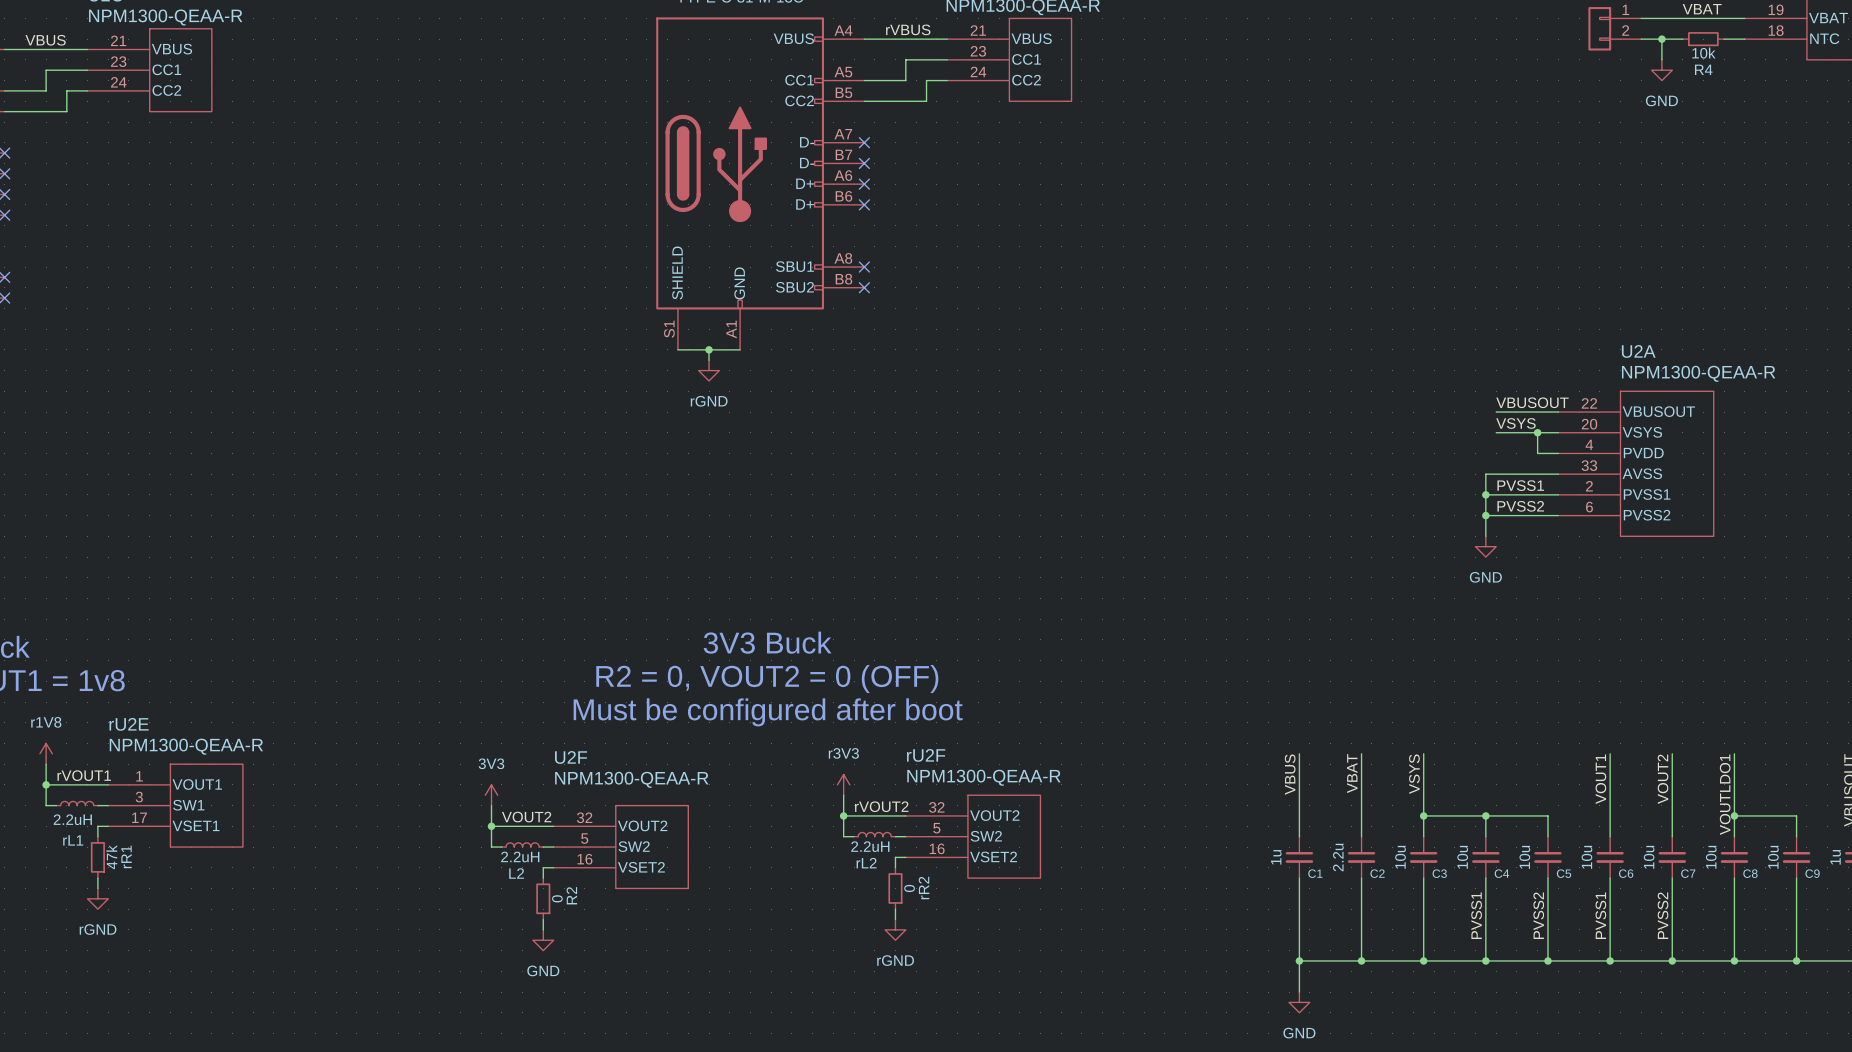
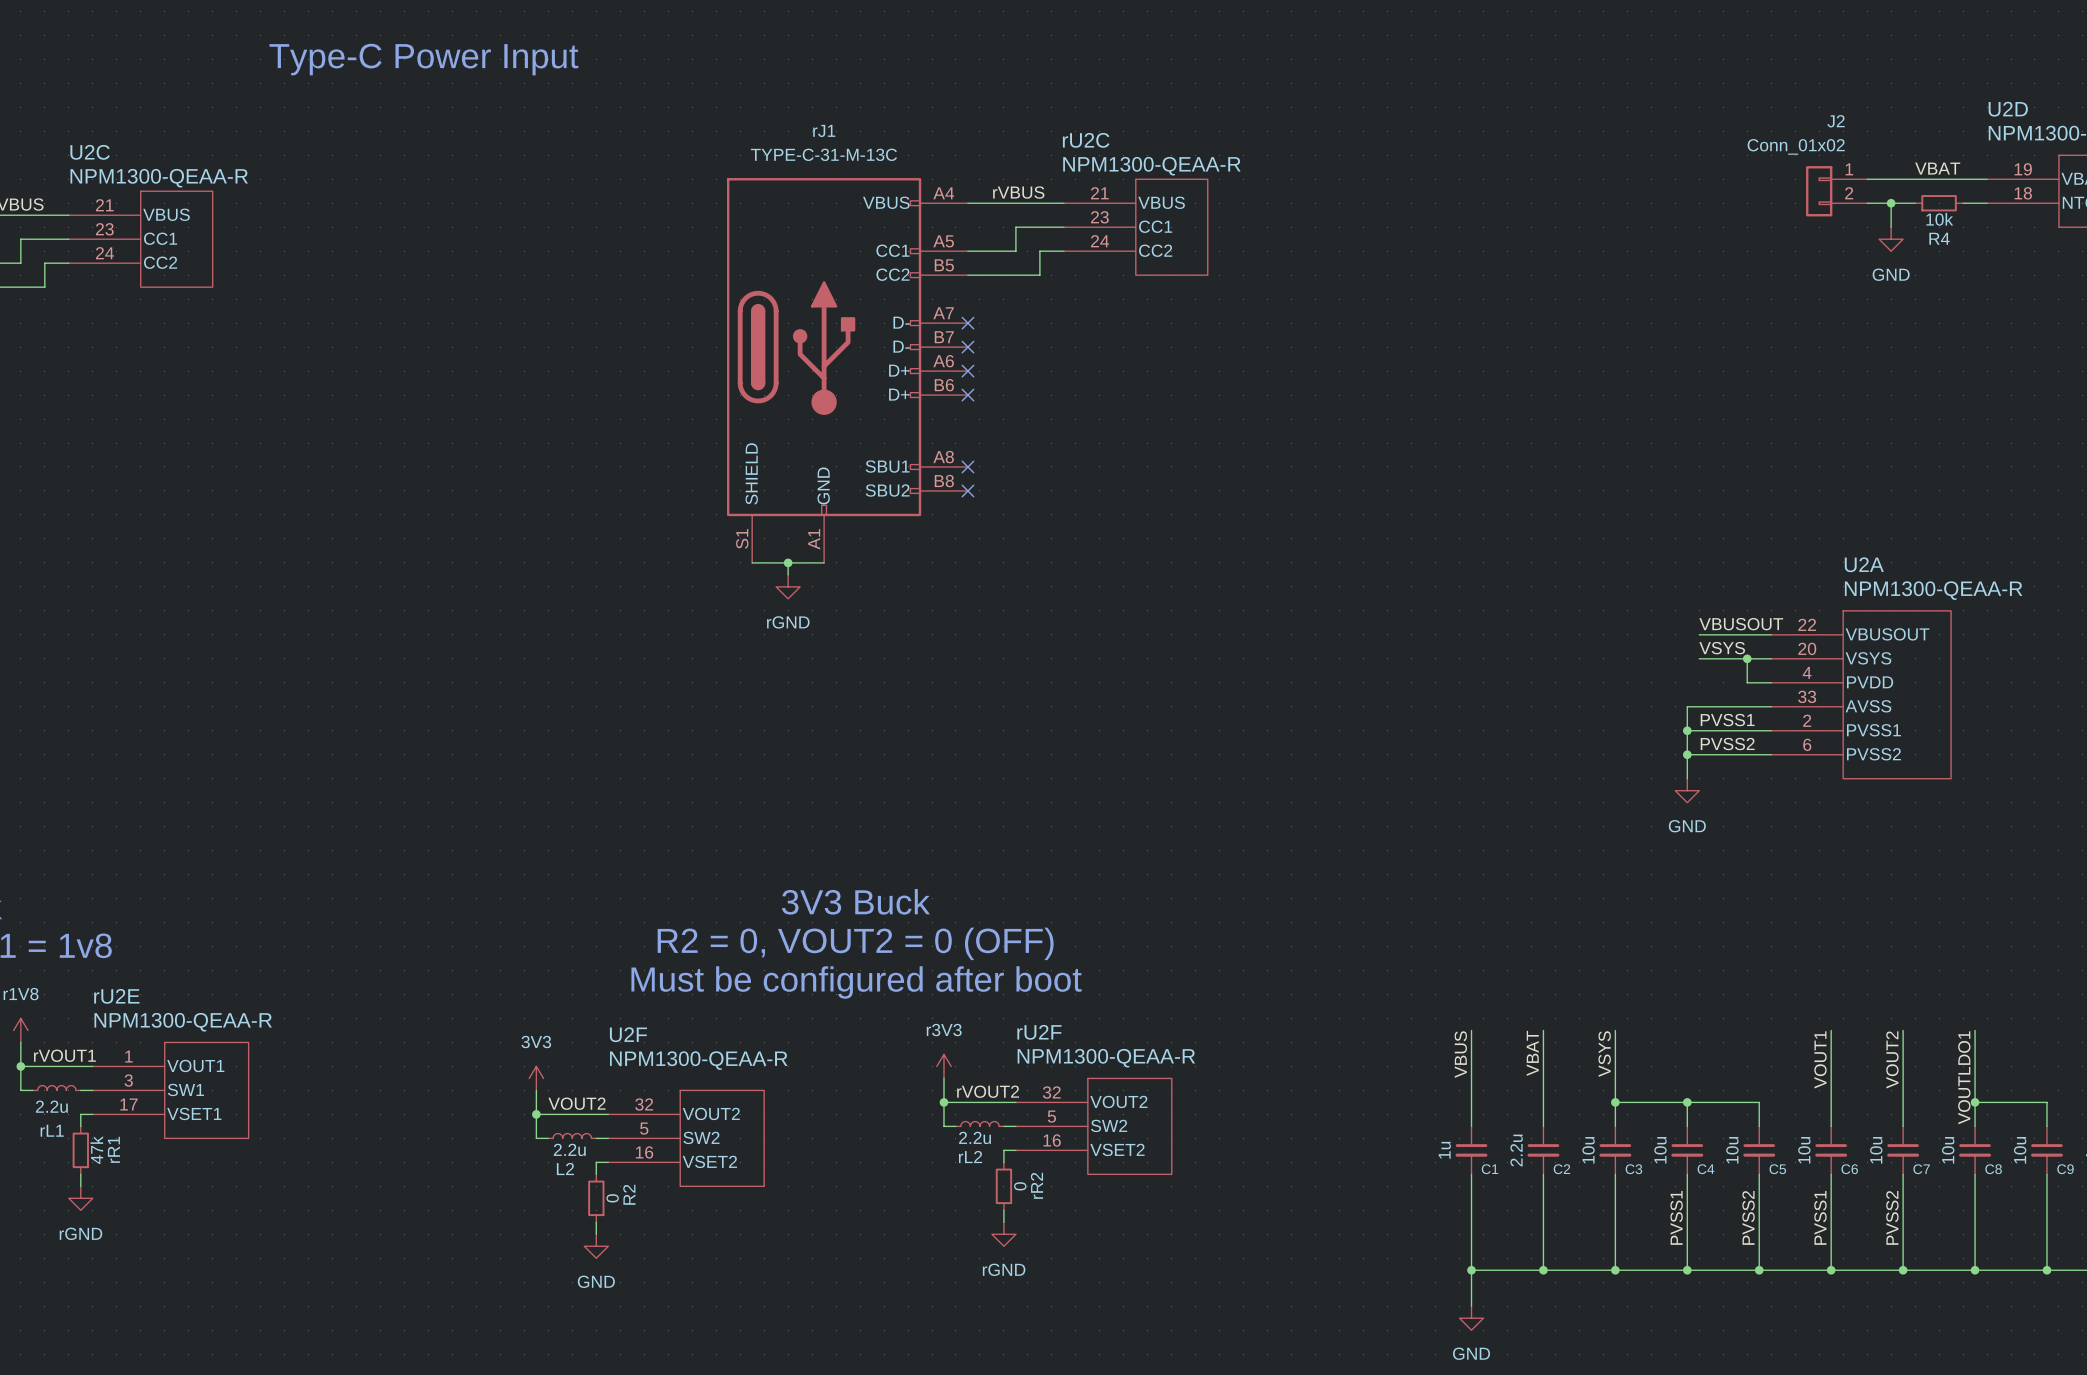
rL1 value: 2.2uH (72, 819) -> 2.2u (51, 1106)
rL2 value: 2.2uH (870, 846) -> 2.2u (975, 1137)
L2 value: 2.2uH (520, 857) -> 2.2u (569, 1149)

